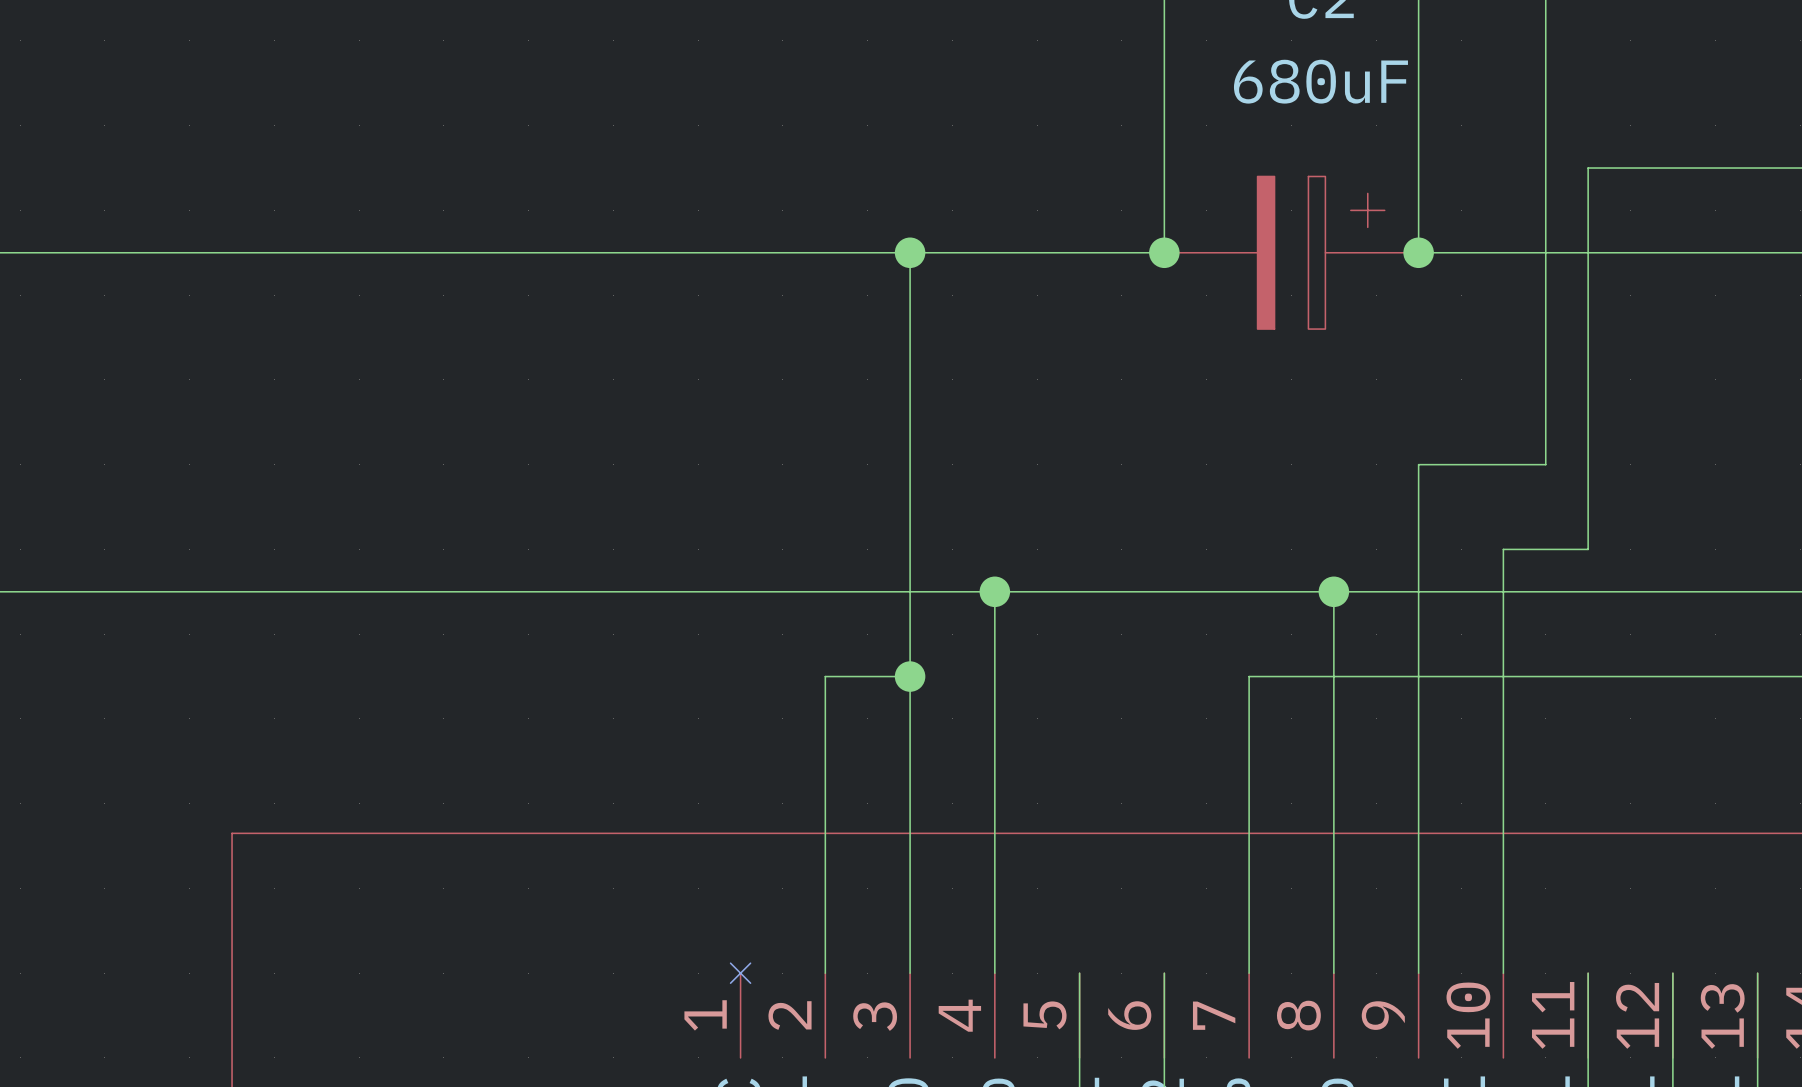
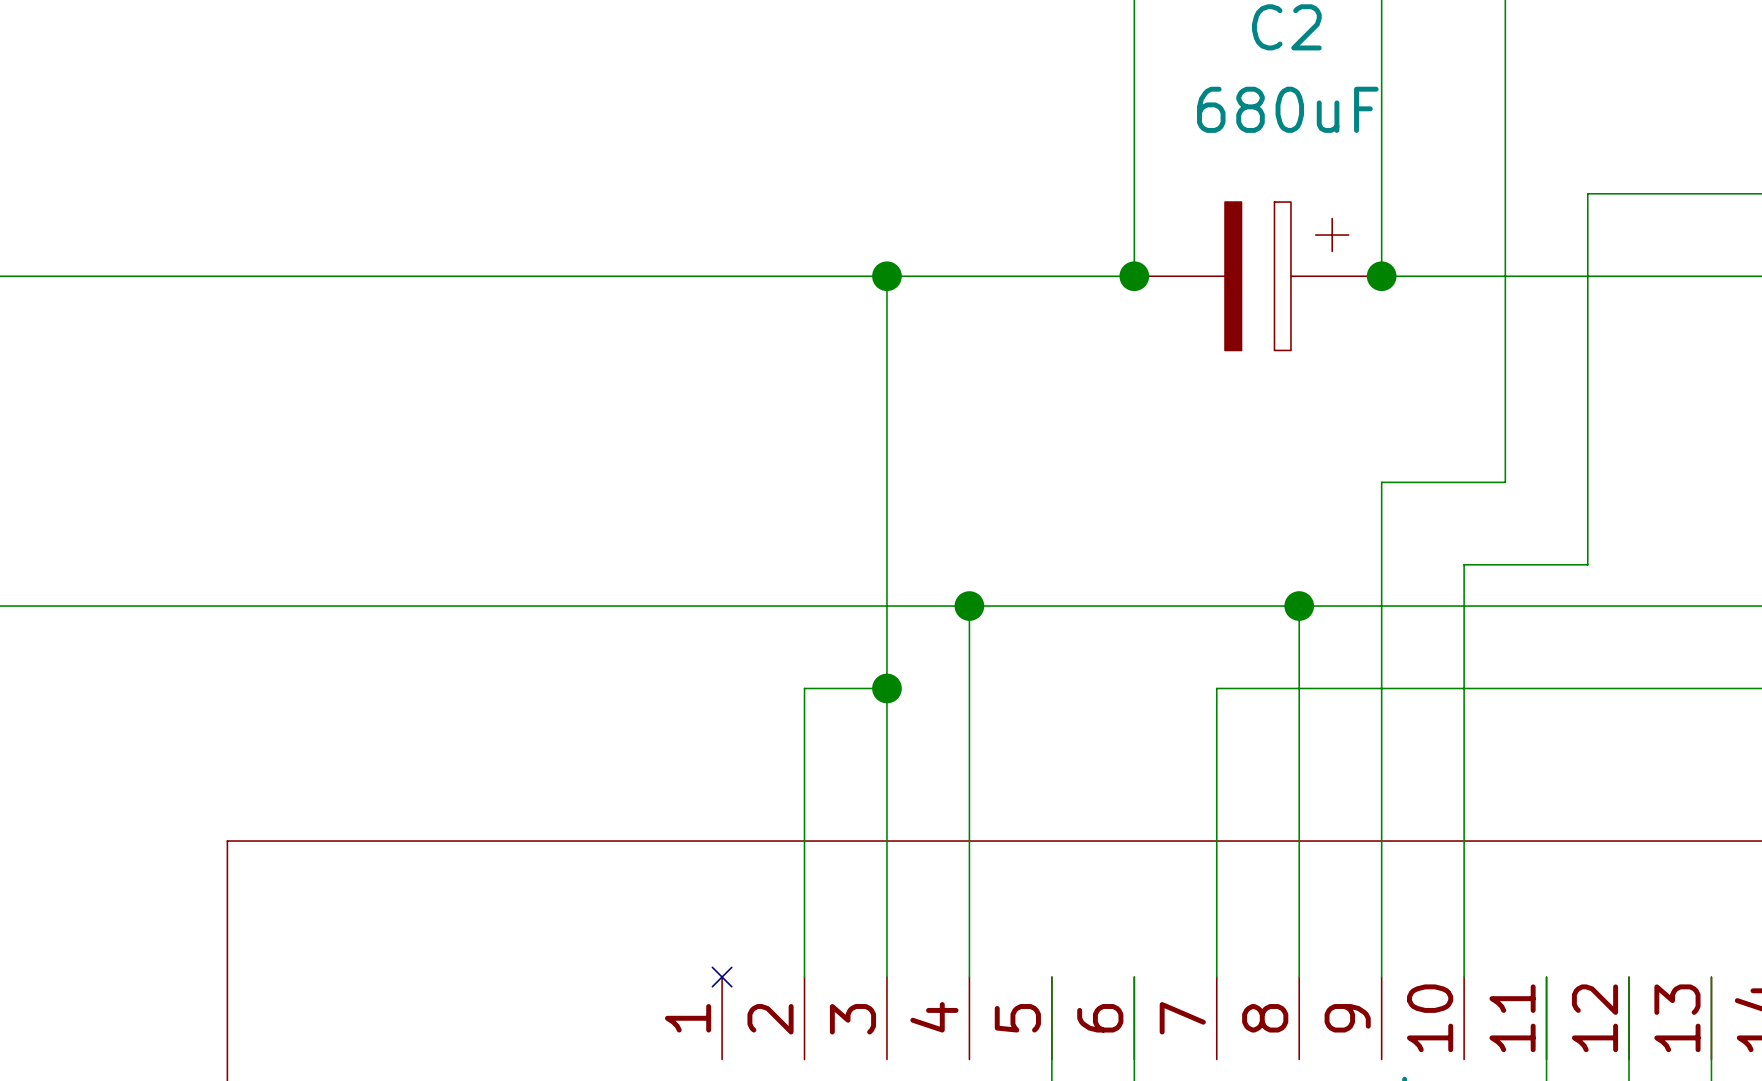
wire: (1630, 168) (1588, 168) (1588, 549) -> (1587, 193) (1587, 564) (1546, 564)

